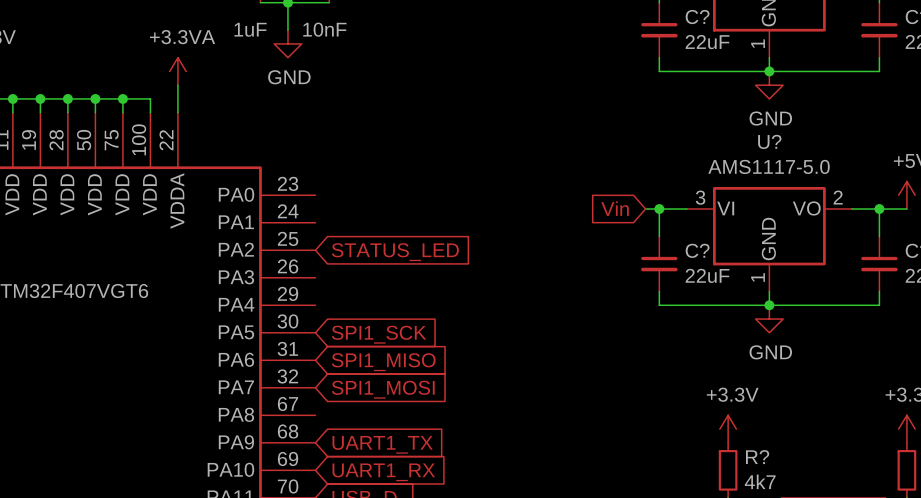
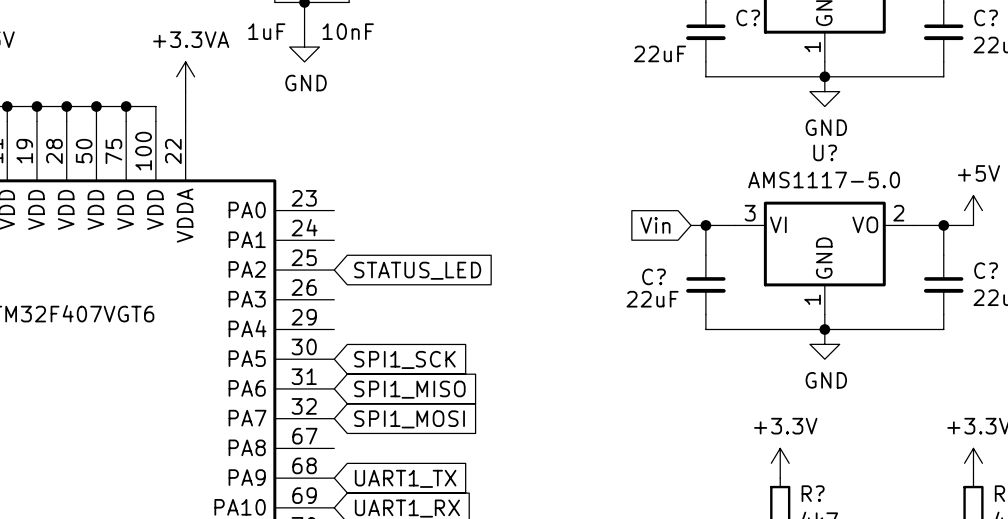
C? value position: 22uF (707, 42) -> 22uF (660, 53)
C? name position: C? (697, 250) -> C? (653, 276)
C? value position: 22uF (707, 275) -> 22uF (652, 299)

